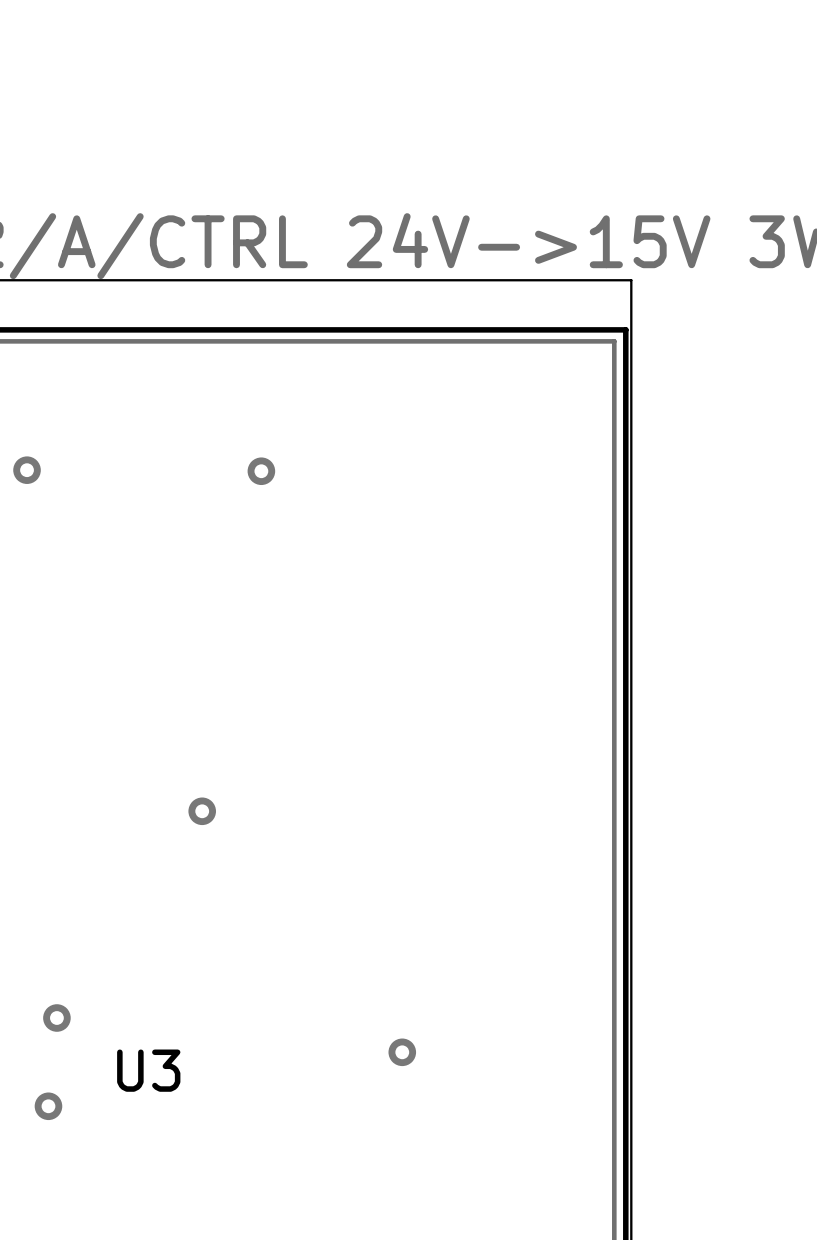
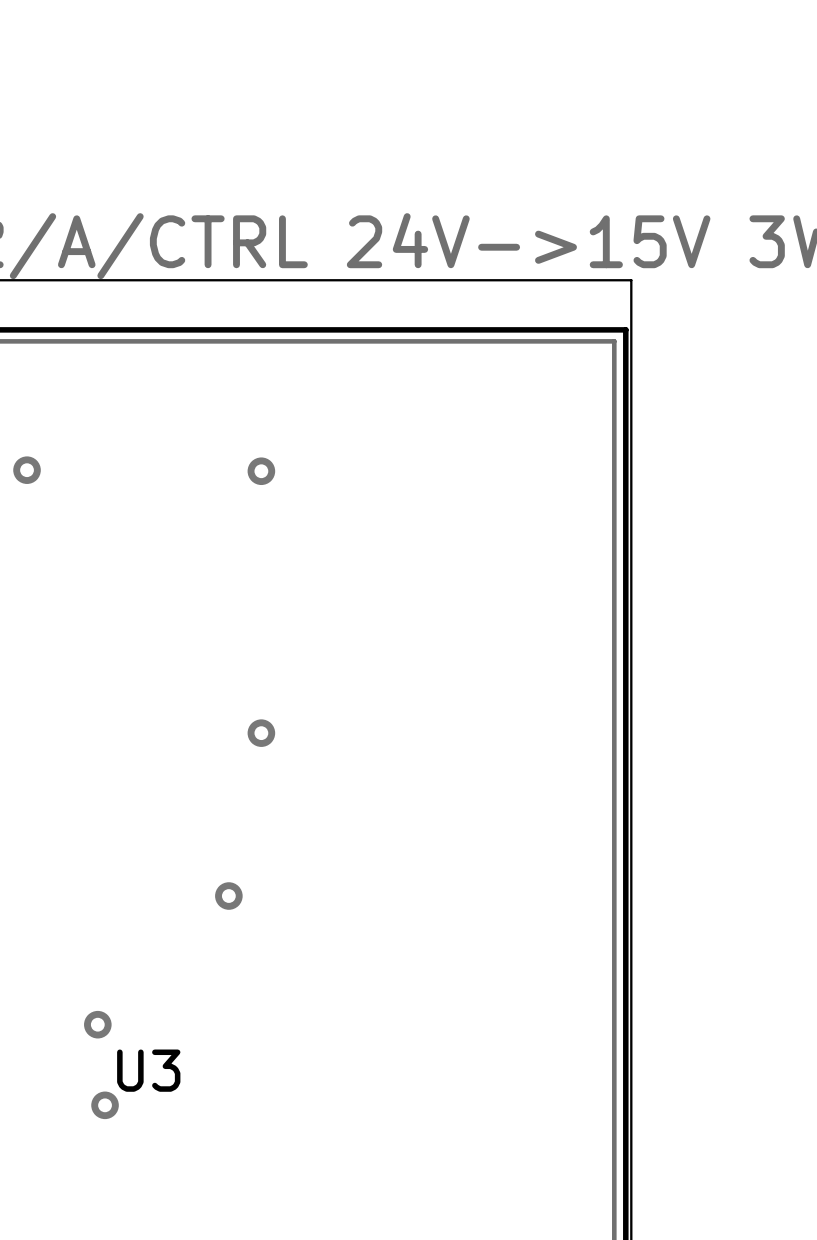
via: none -> (261, 733)
via: (202, 811) -> none
via: none -> (228, 896)
via position: (56, 1018) -> (97, 1024)
via: (402, 1052) -> none
via: none -> (105, 1105)
via: (48, 1106) -> none

